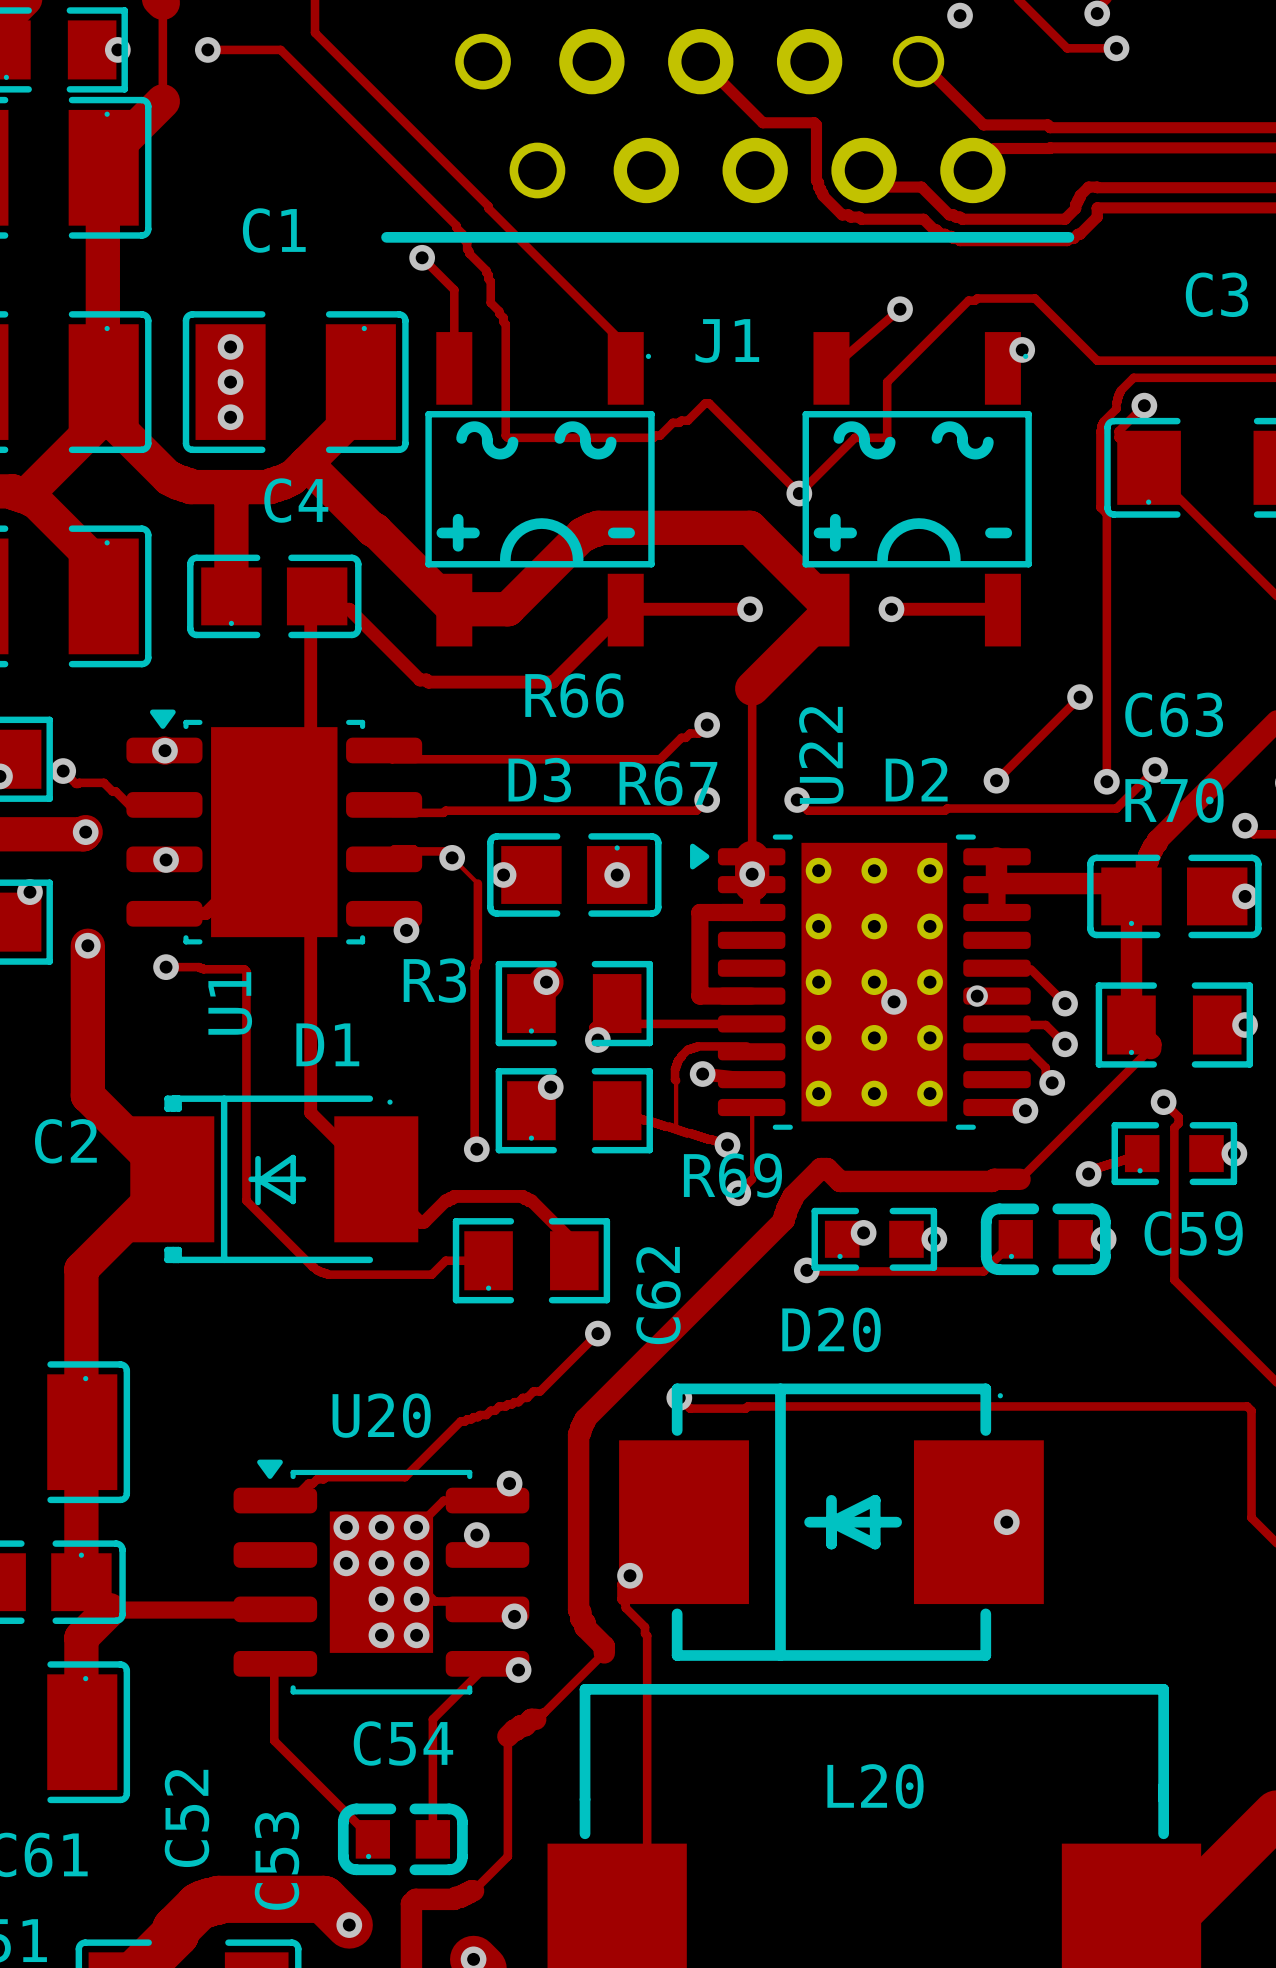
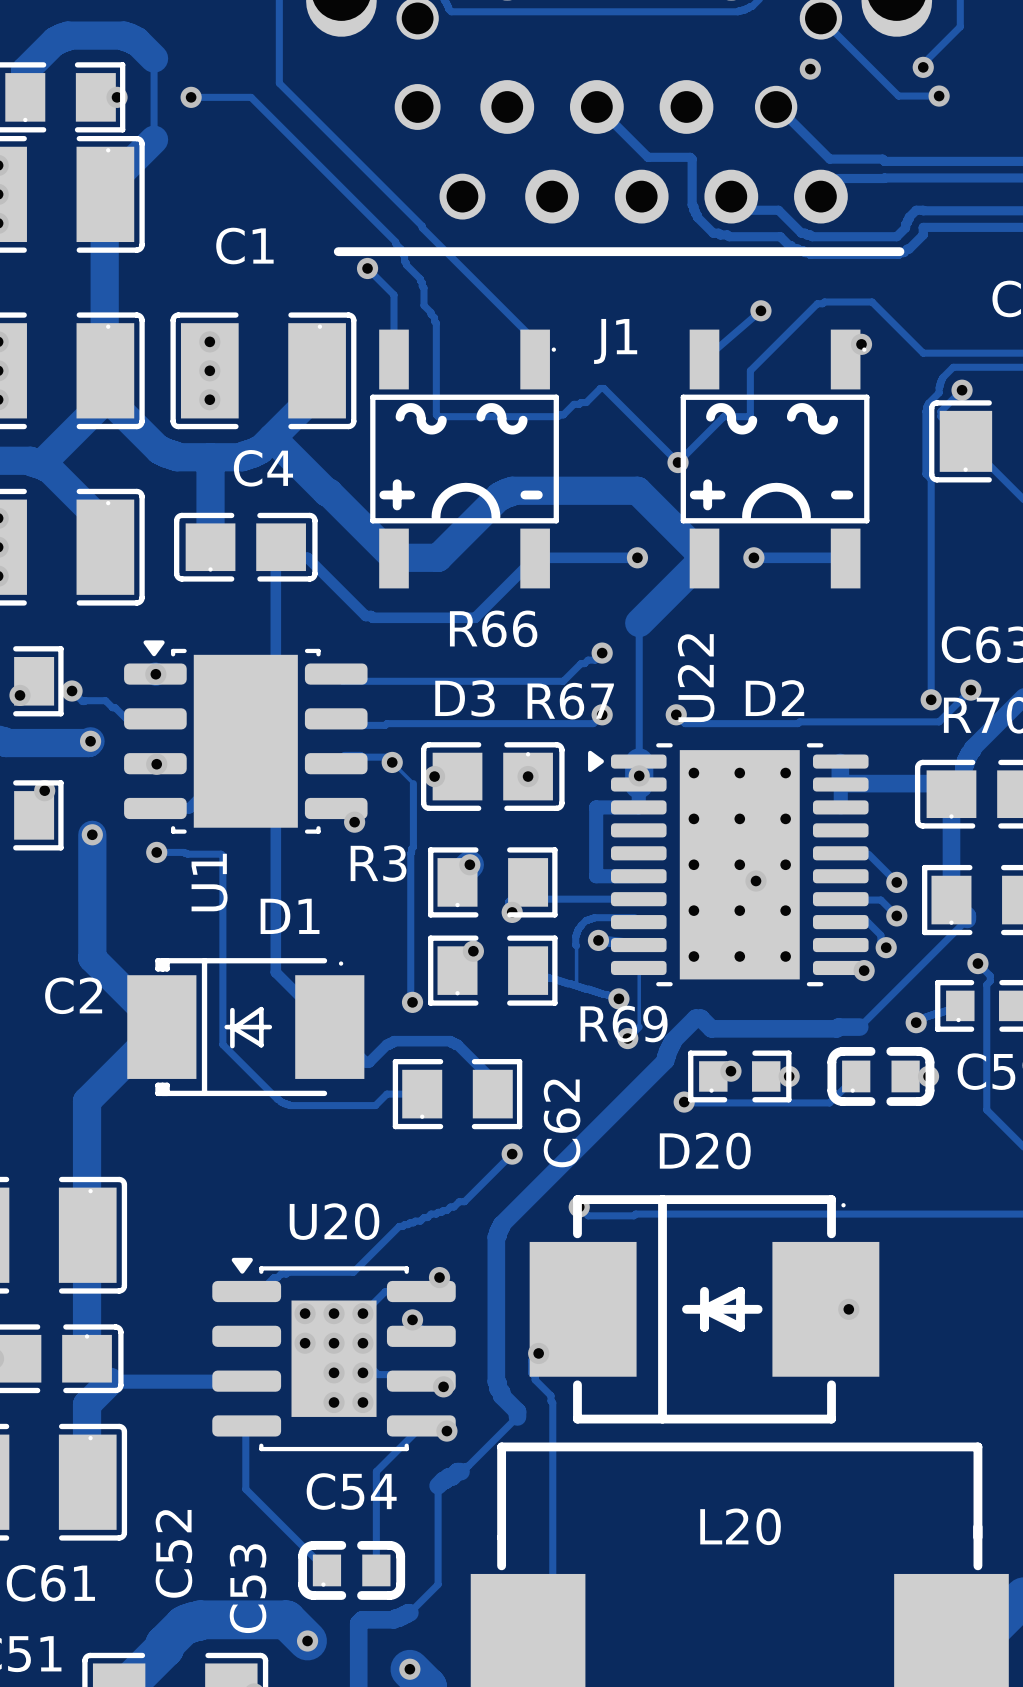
track: (1080, 697) (996, 780) -> none
via: (1080, 697) -> none
via: (996, 780) -> none
via: (977, 996) -> none

